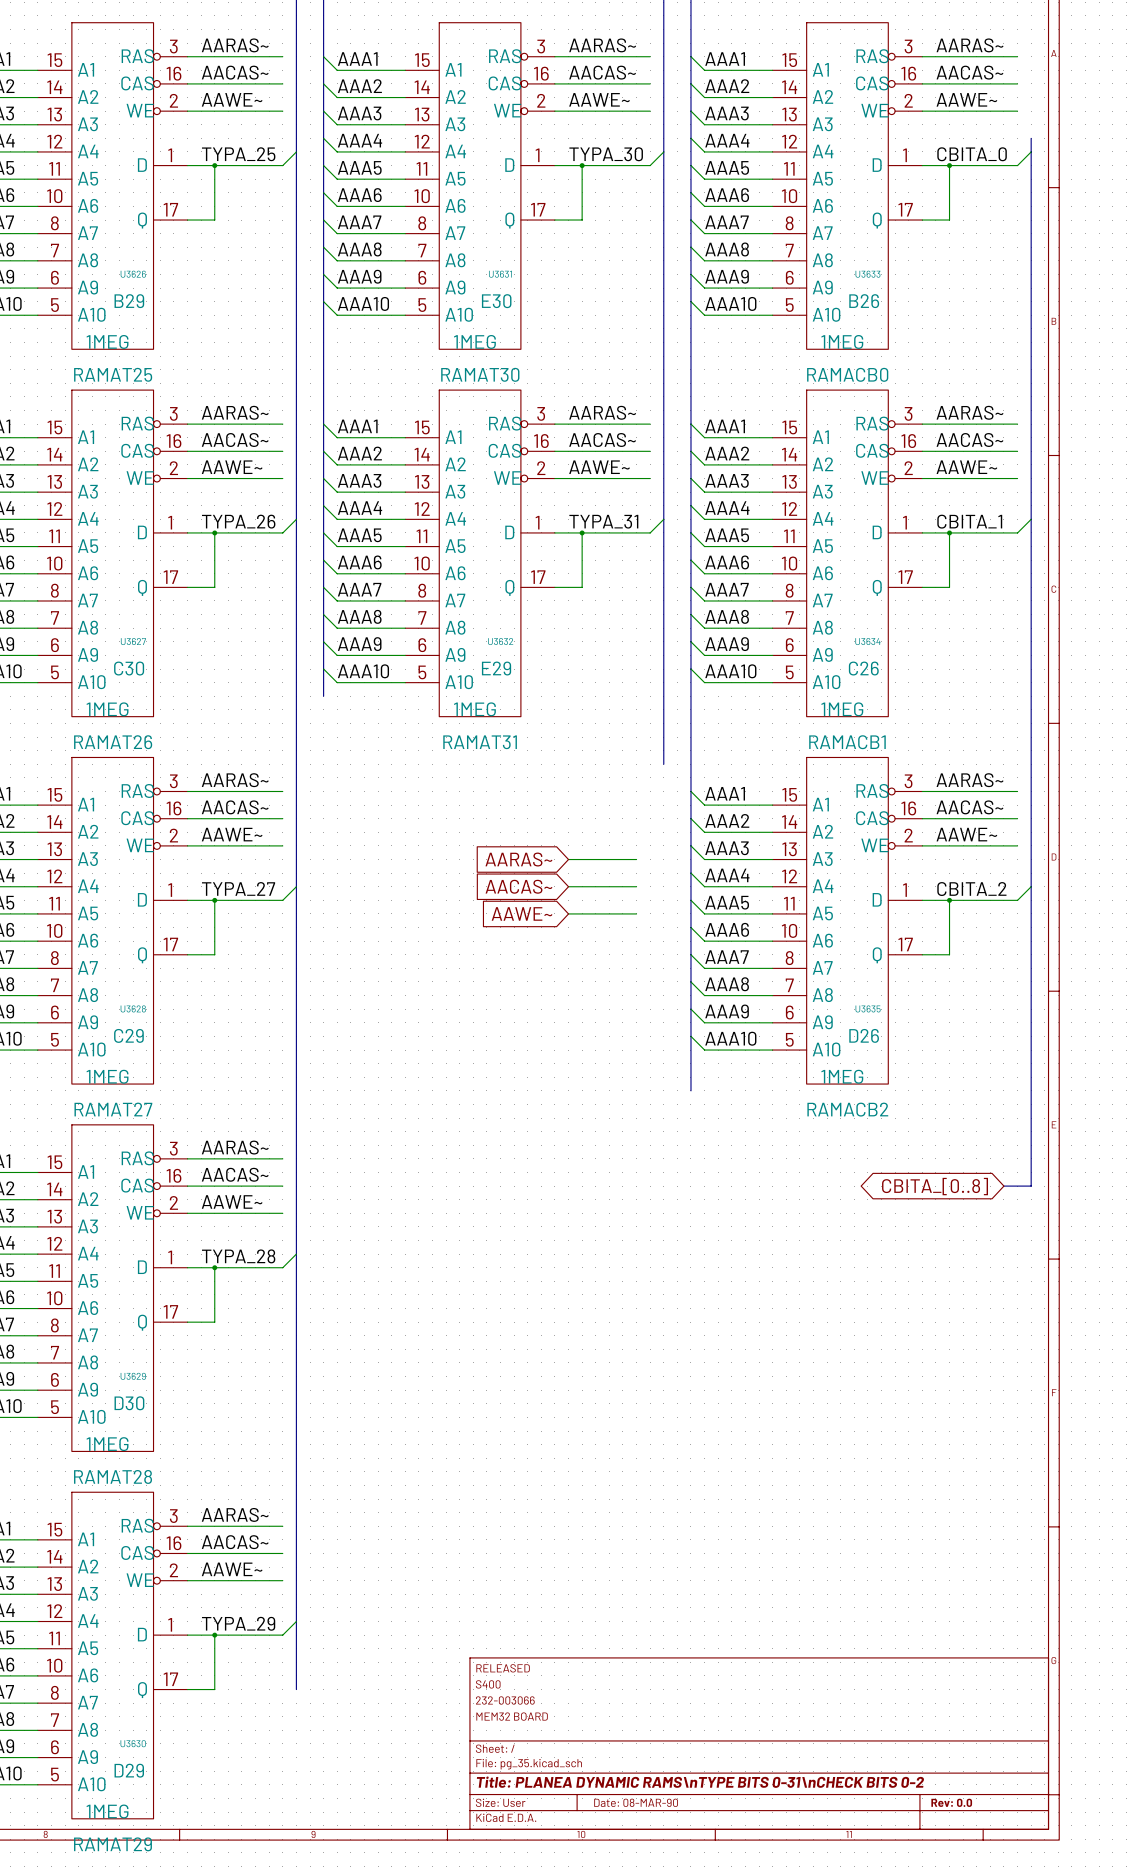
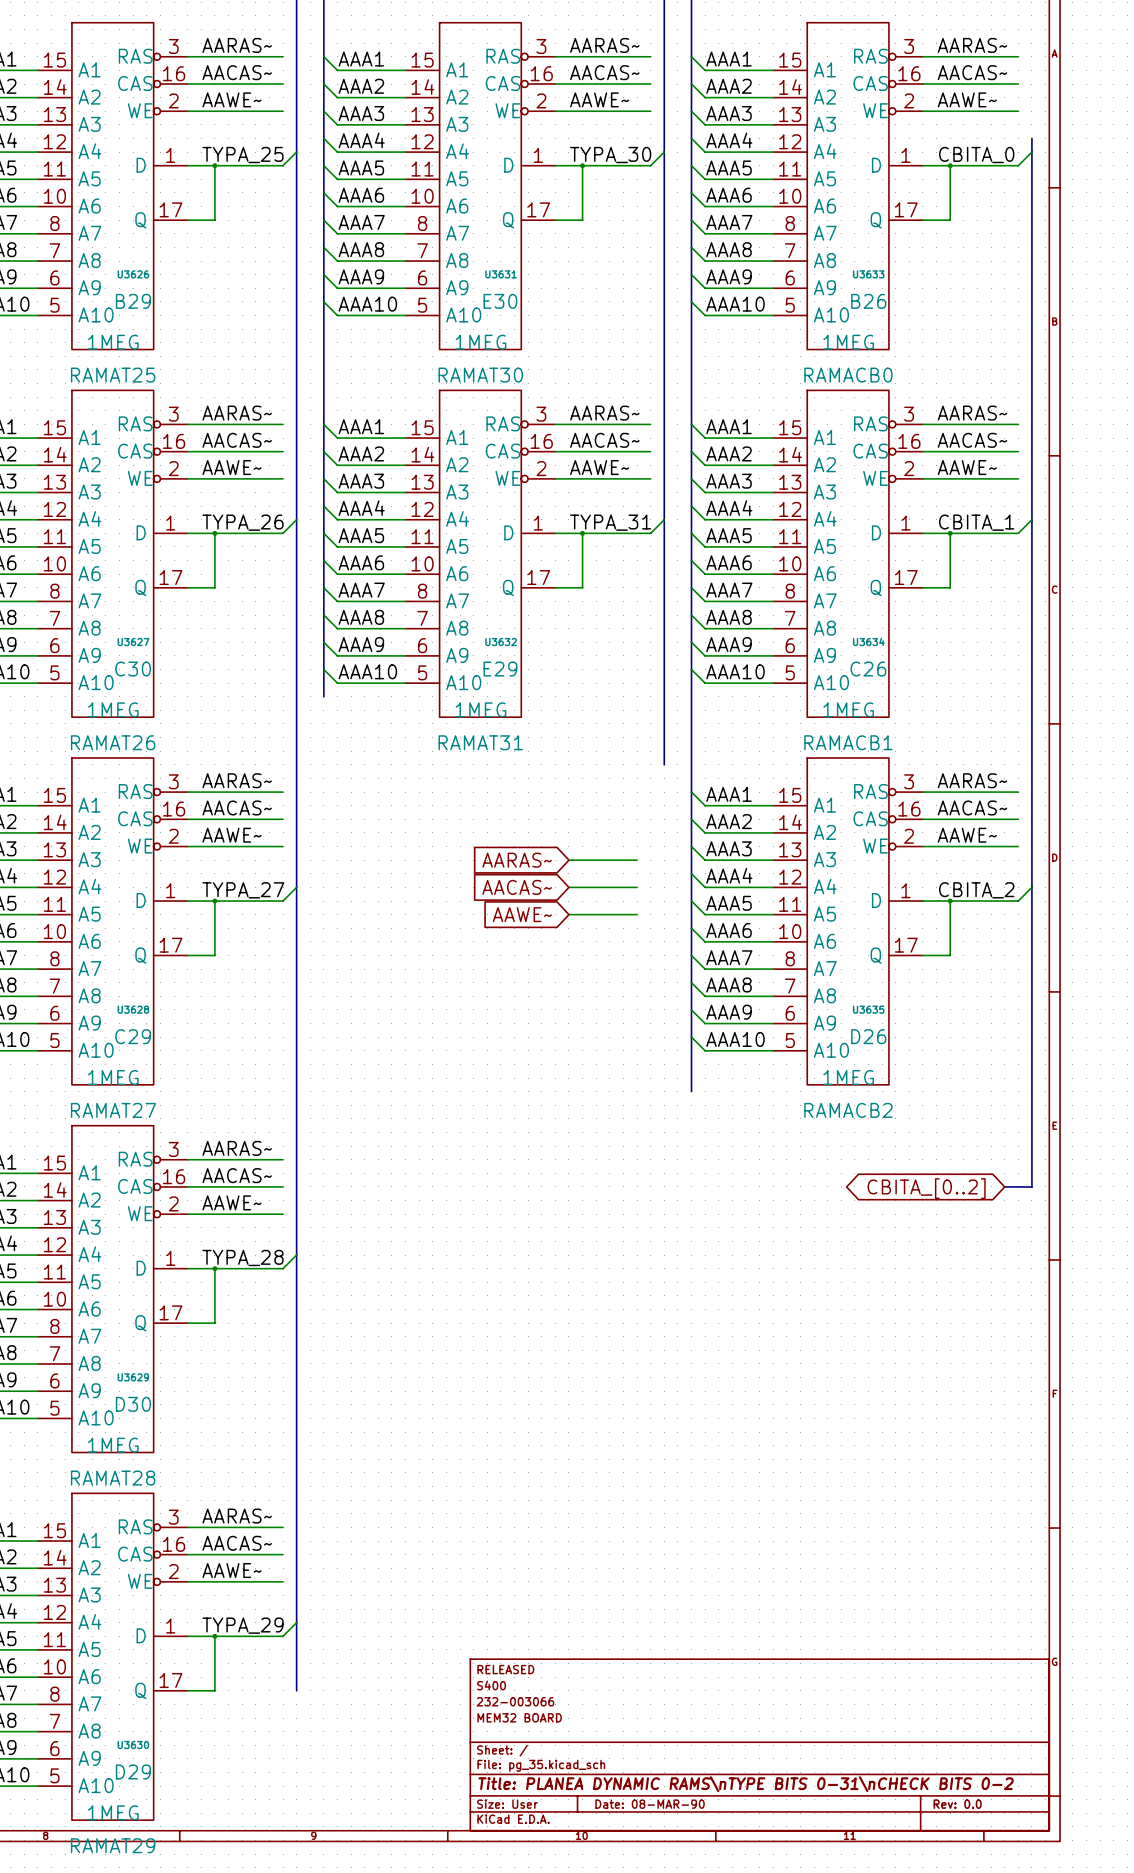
global label: CBITA_[0..8] (935, 1186) -> CBITA_[0..2] (926, 1188)

